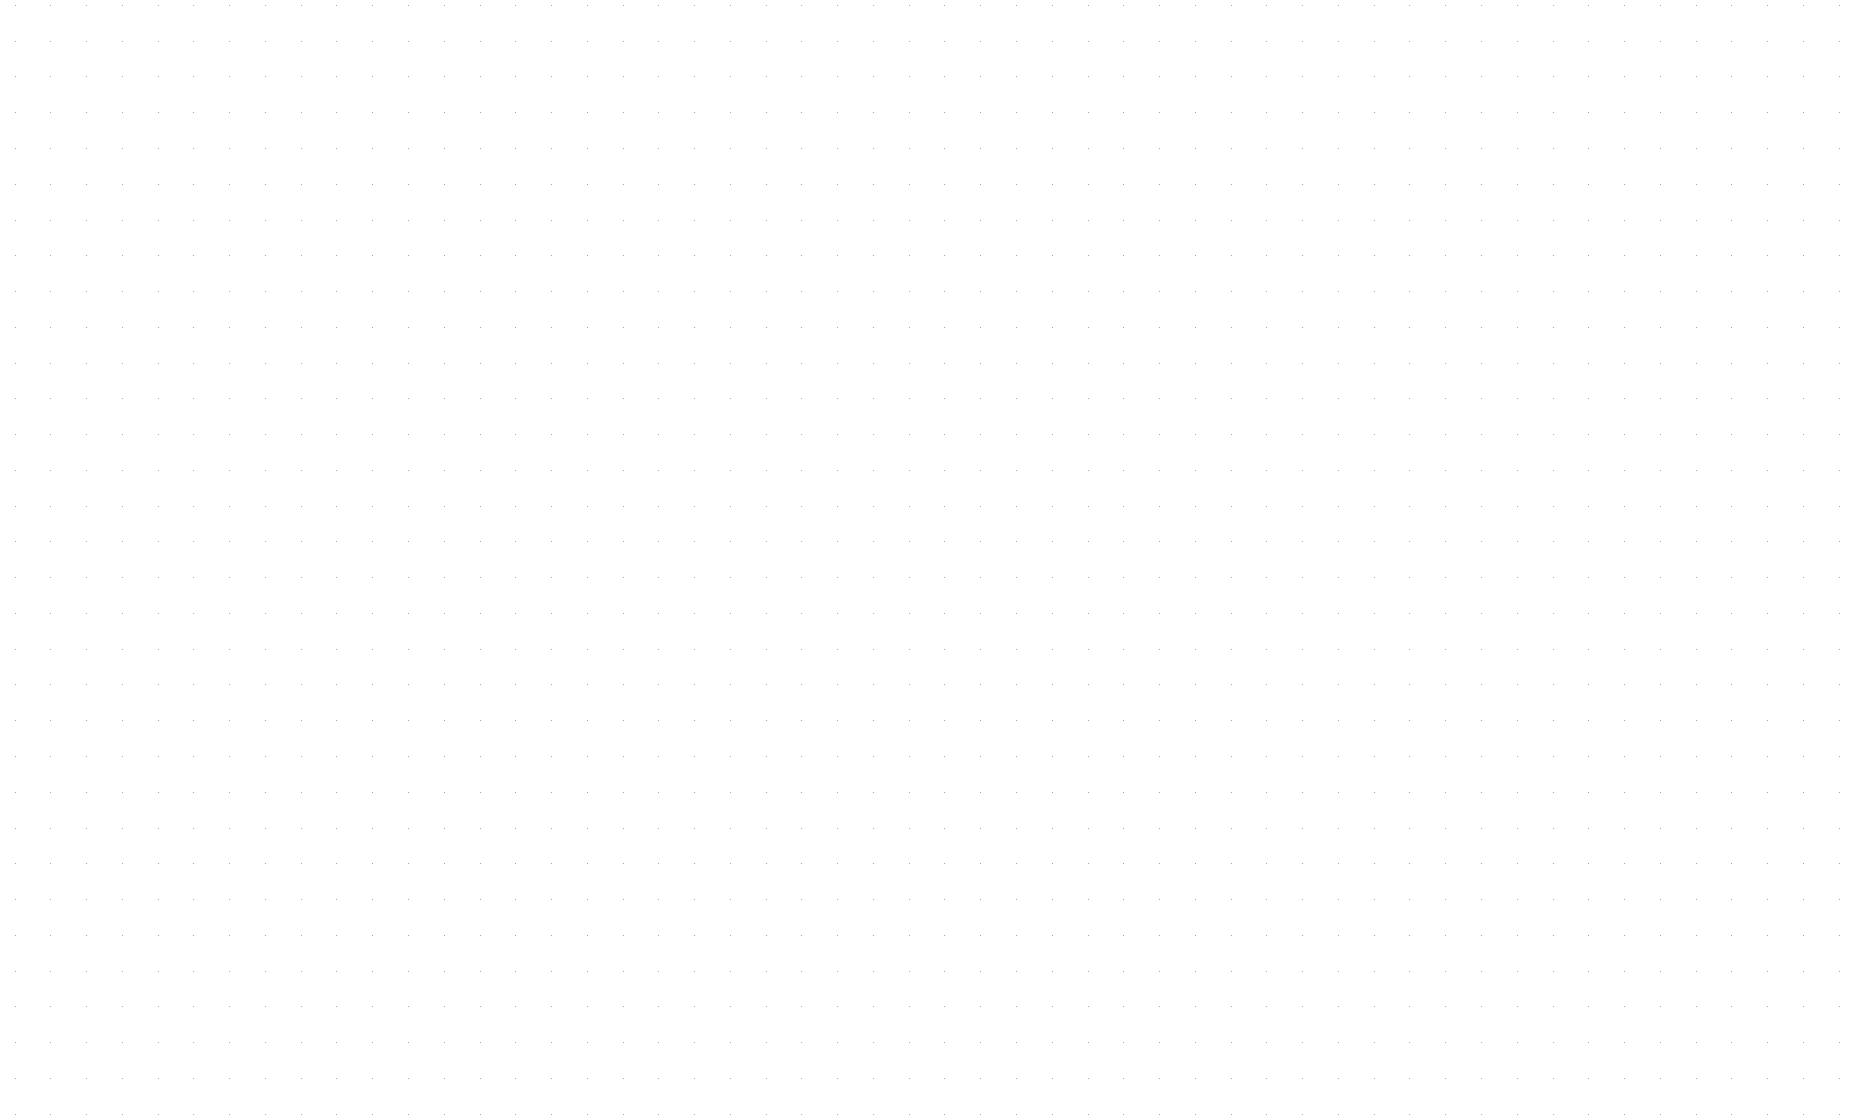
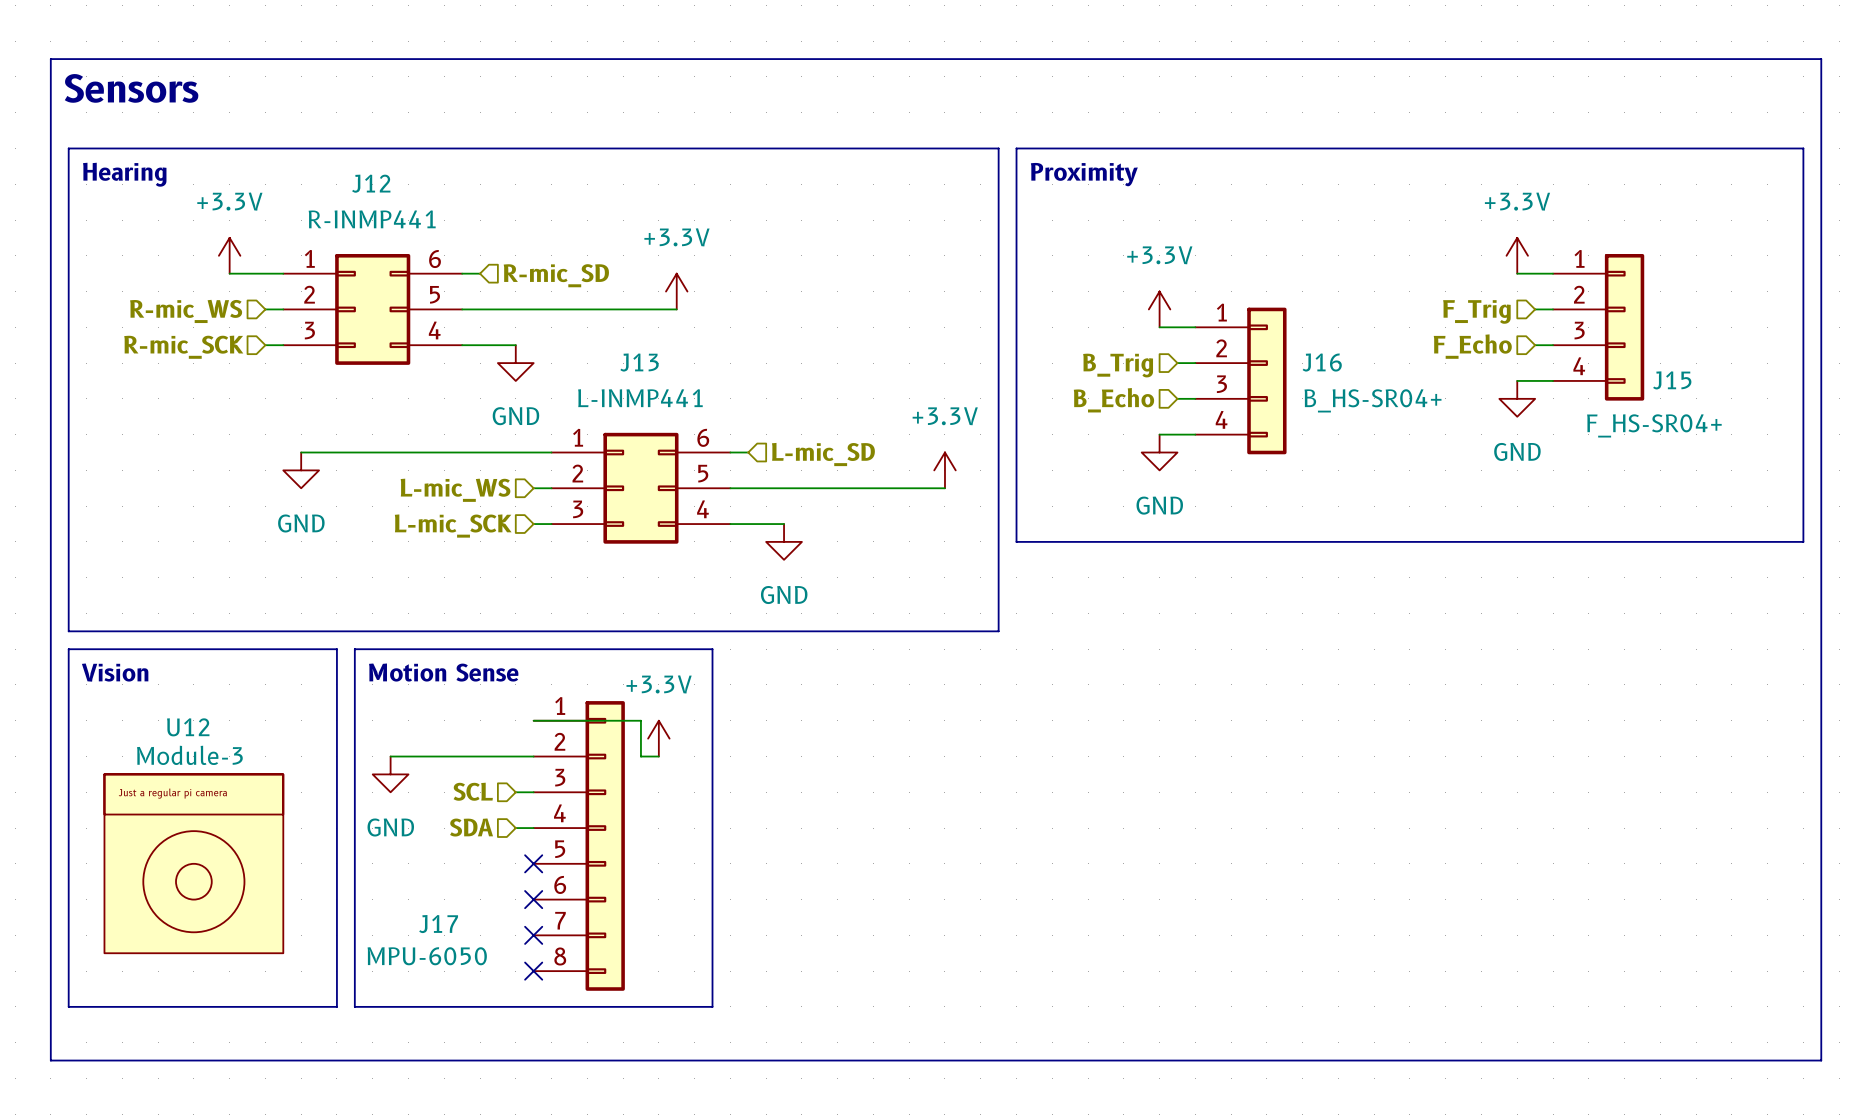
line: none -> (50, 59) (1821, 59) (1821, 1060) (50, 1060) (50, 59)
text: none -> Sensors (131, 88)
line: none -> (68, 148) (998, 148) (998, 631) (68, 631) (68, 148)
line: none -> (1016, 148) (1803, 148) (1803, 541) (1016, 541) (1016, 148)
text: none -> Hearing (124, 174)
text: none -> Proximity (1084, 174)
power symbol: none -> +3.3V (229, 255)
power symbol: none -> +3.3V (1517, 255)
wire: none -> (229, 273) (283, 273)
wire: none -> (462, 273) (480, 273)
wire: none -> (1517, 273) (1553, 273)
hierarchical label: none -> R-mic_SD (556, 275)
power symbol: none -> +3.3V (676, 291)
wire: none -> (265, 309) (283, 309)
J12: none -> R-INMP441 (372, 309)
wire: none -> (462, 309) (676, 309)
power symbol: none -> +3.3V (1159, 309)
wire: none -> (1535, 309) (1553, 309)
hierarchical label: none -> R-mic_WS (186, 311)
hierarchical label: none -> F_Trig (1476, 311)
wire: none -> (1159, 327) (1195, 327)
J15: none -> F_HS-SR04+ (1598, 327)
wire: none -> (265, 345) (283, 345)
wire: none -> (462, 345) (515, 345)
wire: none -> (1535, 345) (1553, 345)
hierarchical label: none -> F_Echo (1472, 346)
hierarchical label: none -> R-mic_SCK (183, 347)
power symbol: none -> GND (515, 363)
wire: none -> (1177, 363) (1195, 363)
hierarchical label: none -> B_Trig (1118, 365)
J16: none -> B_HS-SR04+ (1240, 380)
wire: none -> (1517, 380) (1553, 380)
wire: none -> (1177, 398) (1195, 398)
power symbol: none -> GND (1517, 398)
hierarchical label: none -> B_Echo (1113, 400)
wire: none -> (1159, 434) (1195, 434)
wire: none -> (301, 452) (551, 452)
wire: none -> (730, 452) (748, 452)
power symbol: none -> GND (1159, 452)
hierarchical label: none -> L-mic_SD (823, 454)
power symbol: none -> GND (301, 470)
power symbol: none -> +3.3V (944, 470)
wire: none -> (533, 488) (551, 488)
J13: none -> L-INMP441 (640, 488)
wire: none -> (730, 488) (944, 488)
hierarchical label: none -> L-mic_WS (455, 490)
wire: none -> (533, 524) (551, 524)
wire: none -> (730, 524) (784, 524)
hierarchical label: none -> L-mic_SCK (453, 526)
power symbol: none -> GND (784, 541)
line: none -> (68, 649) (336, 649) (336, 1006) (68, 1006) (68, 649)
line: none -> (354, 649) (712, 649) (712, 1006) (354, 1006) (354, 649)
text: none -> Vision (115, 672)
text: none -> Motion Sense (443, 672)
wire: none -> (533, 720) (640, 720) (640, 756) (658, 756)
power symbol: none -> +3.3V (658, 738)
wire: none -> (390, 756) (533, 756)
power symbol: none -> GND (390, 774)
hierarchical label: none -> SCL (473, 791)
wire: none -> (515, 792) (533, 792)
hierarchical label: none -> SDA (471, 827)
wire: none -> (515, 828) (533, 828)
J17: none -> MPU-6050 (579, 845)
U12: none -> Module-3 (193, 863)
no-connect mark: none -> (533, 863)
no-connect mark: none -> (533, 899)
no-connect mark: none -> (533, 935)
no-connect mark: none -> (533, 971)

